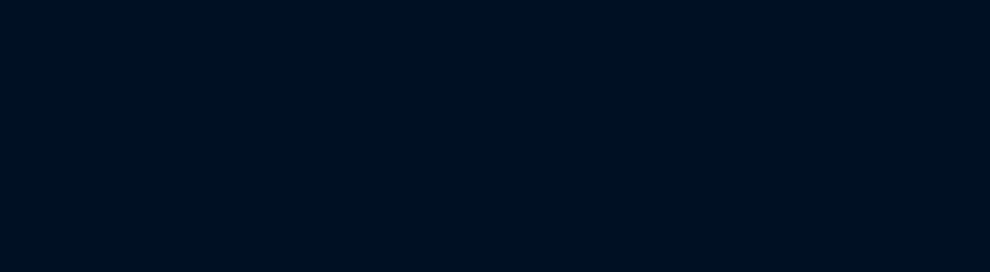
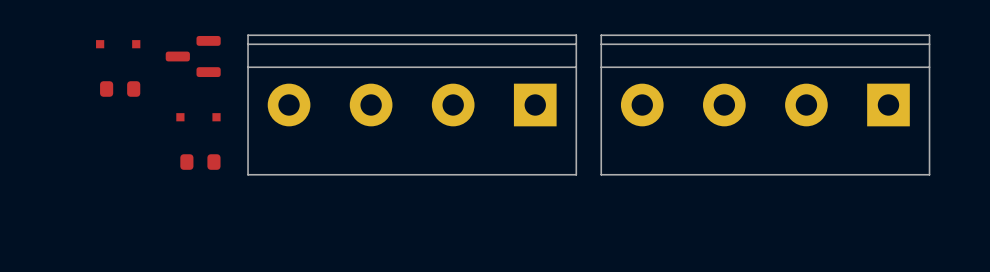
part: none -> (118, 44)
part: none -> (193, 56)
part: none -> (120, 89)
part: none -> (412, 105)
part: none -> (765, 105)
part: none -> (198, 117)
part: none -> (200, 162)

